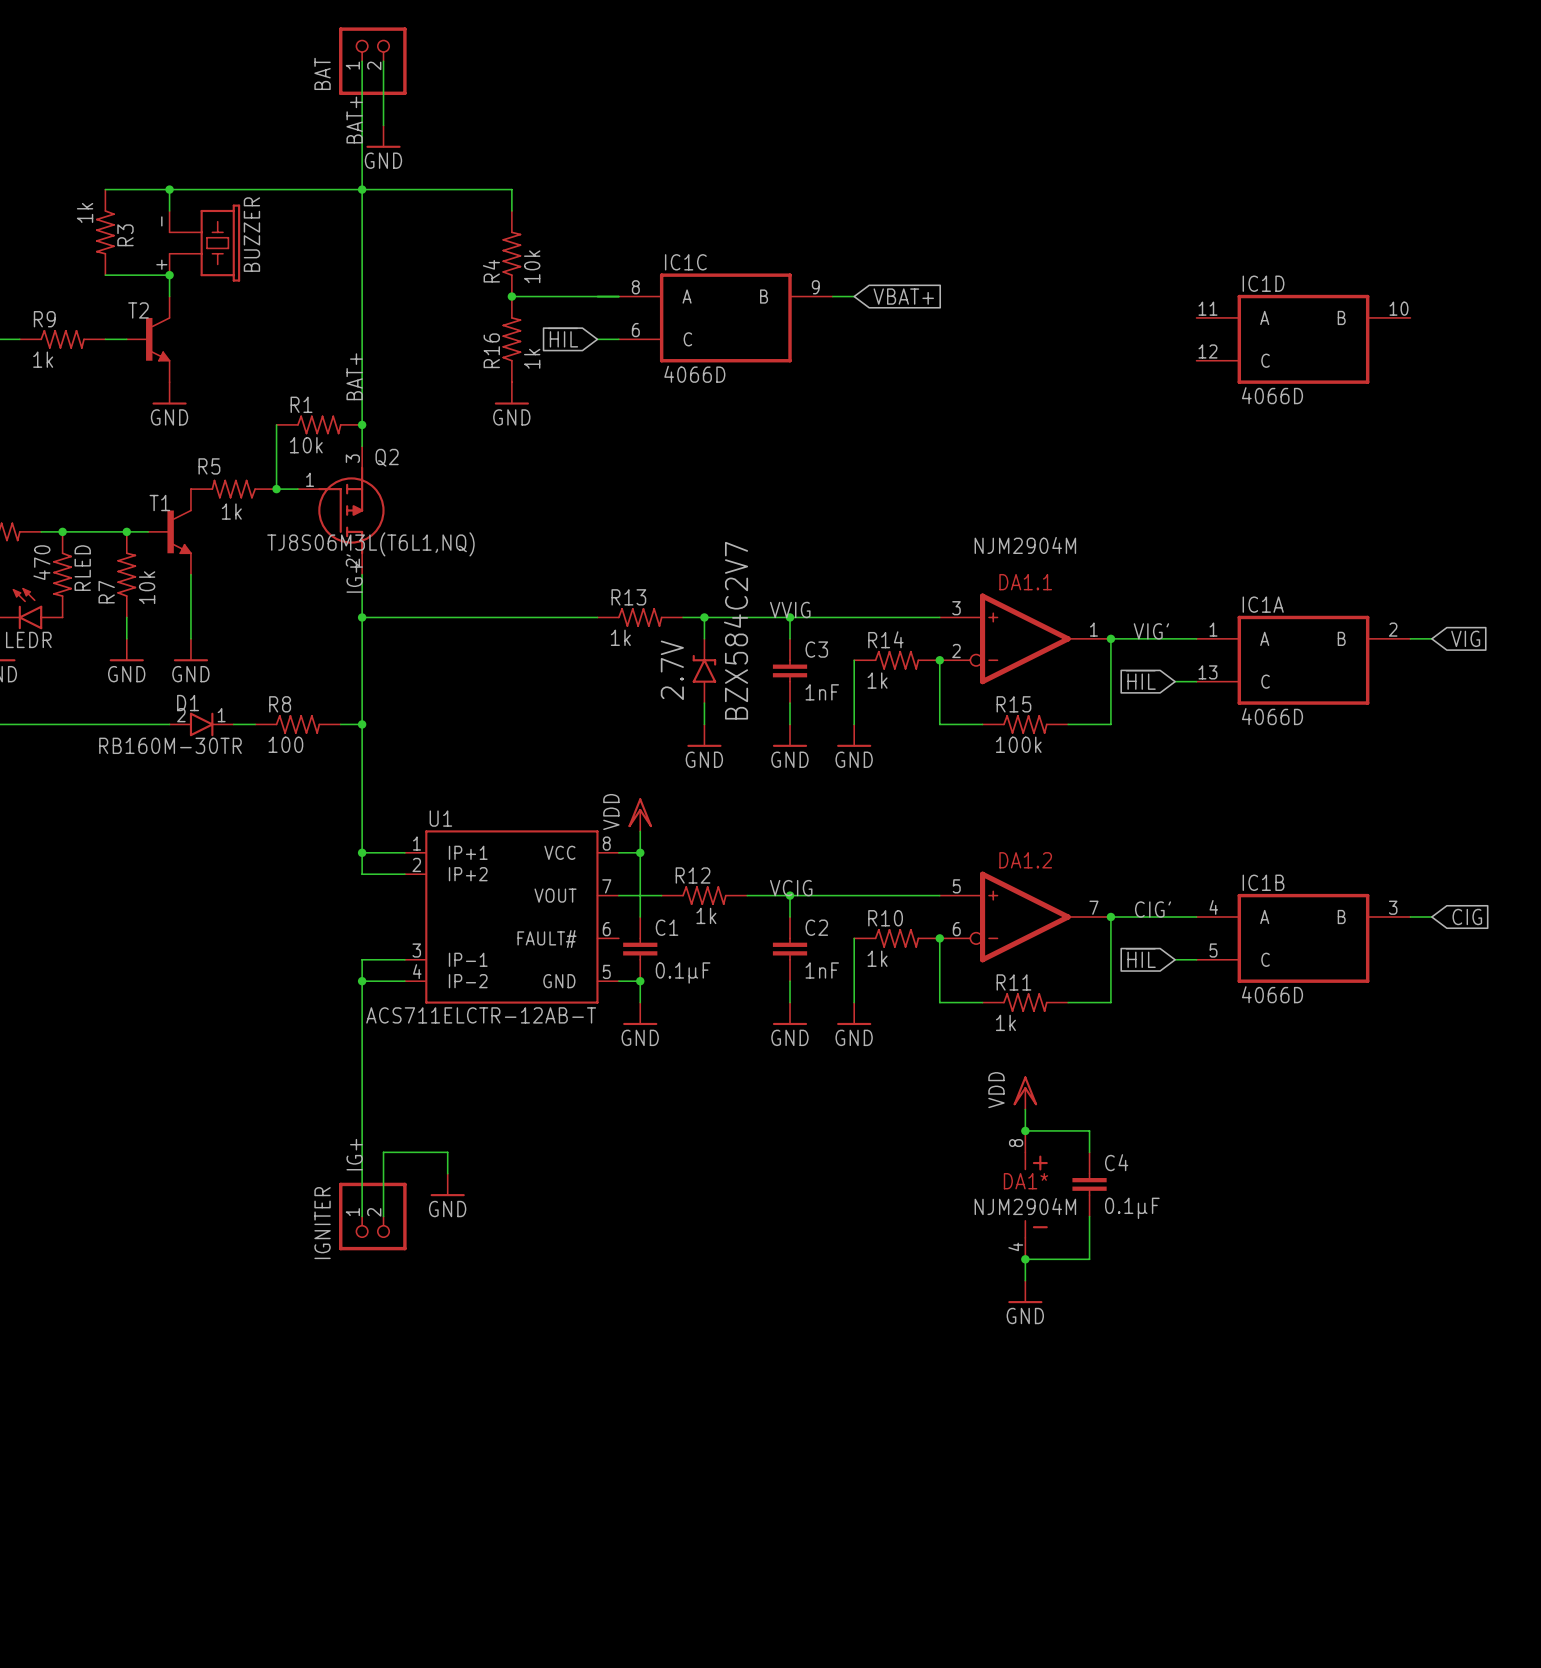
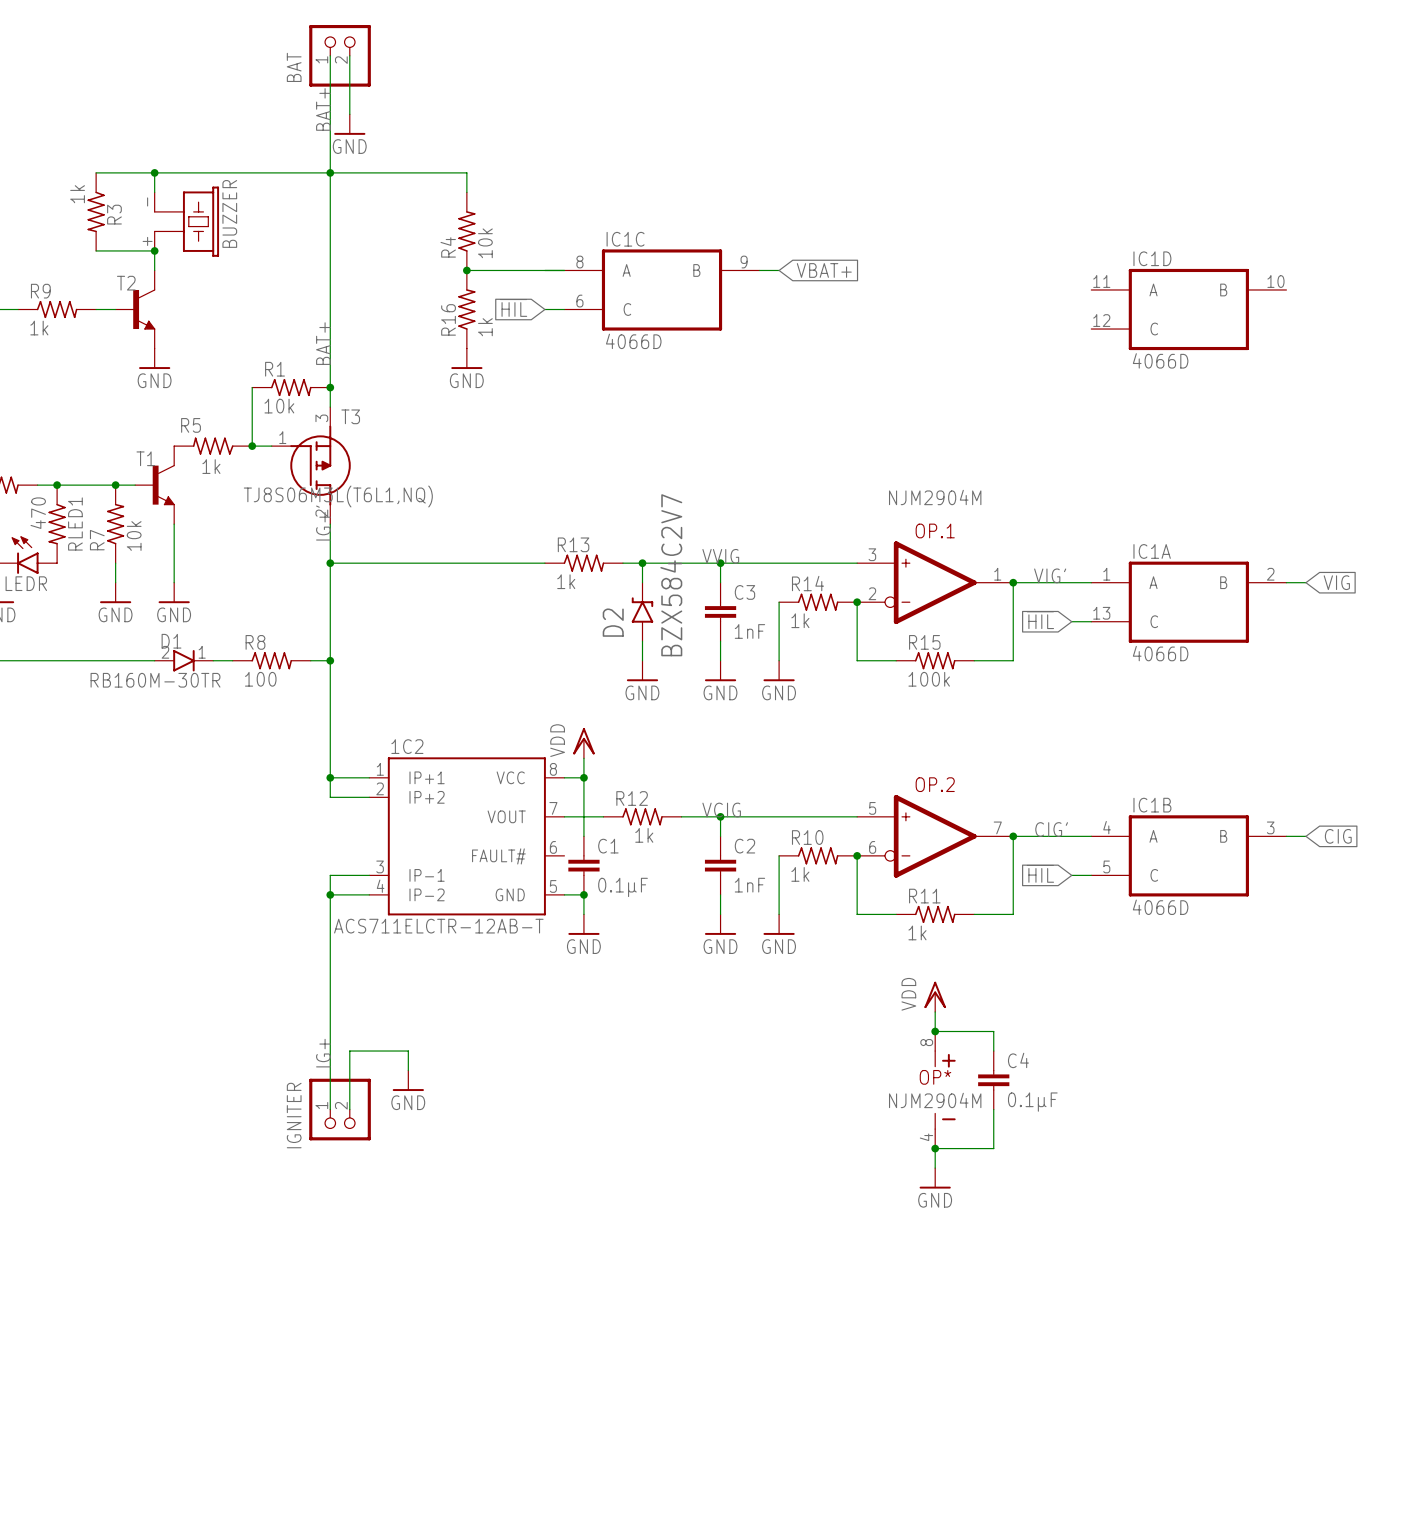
Q2 name: Q2 (387, 457) -> T3 (350, 416)
RLED name: RLED (82, 568) -> RLED1 (75, 523)
DA1.1 name: DA1.1 (1025, 582) -> OP.1 (935, 530)
2.7V name: 2.7V (672, 670) -> D2 (613, 622)
U1 name: U1 (440, 818) -> 1C2 (407, 746)
DA1.2 name: DA1.2 (1025, 860) -> OP.2 (935, 784)
DA1* name: DA1* (1026, 1181) -> OP* (935, 1077)

